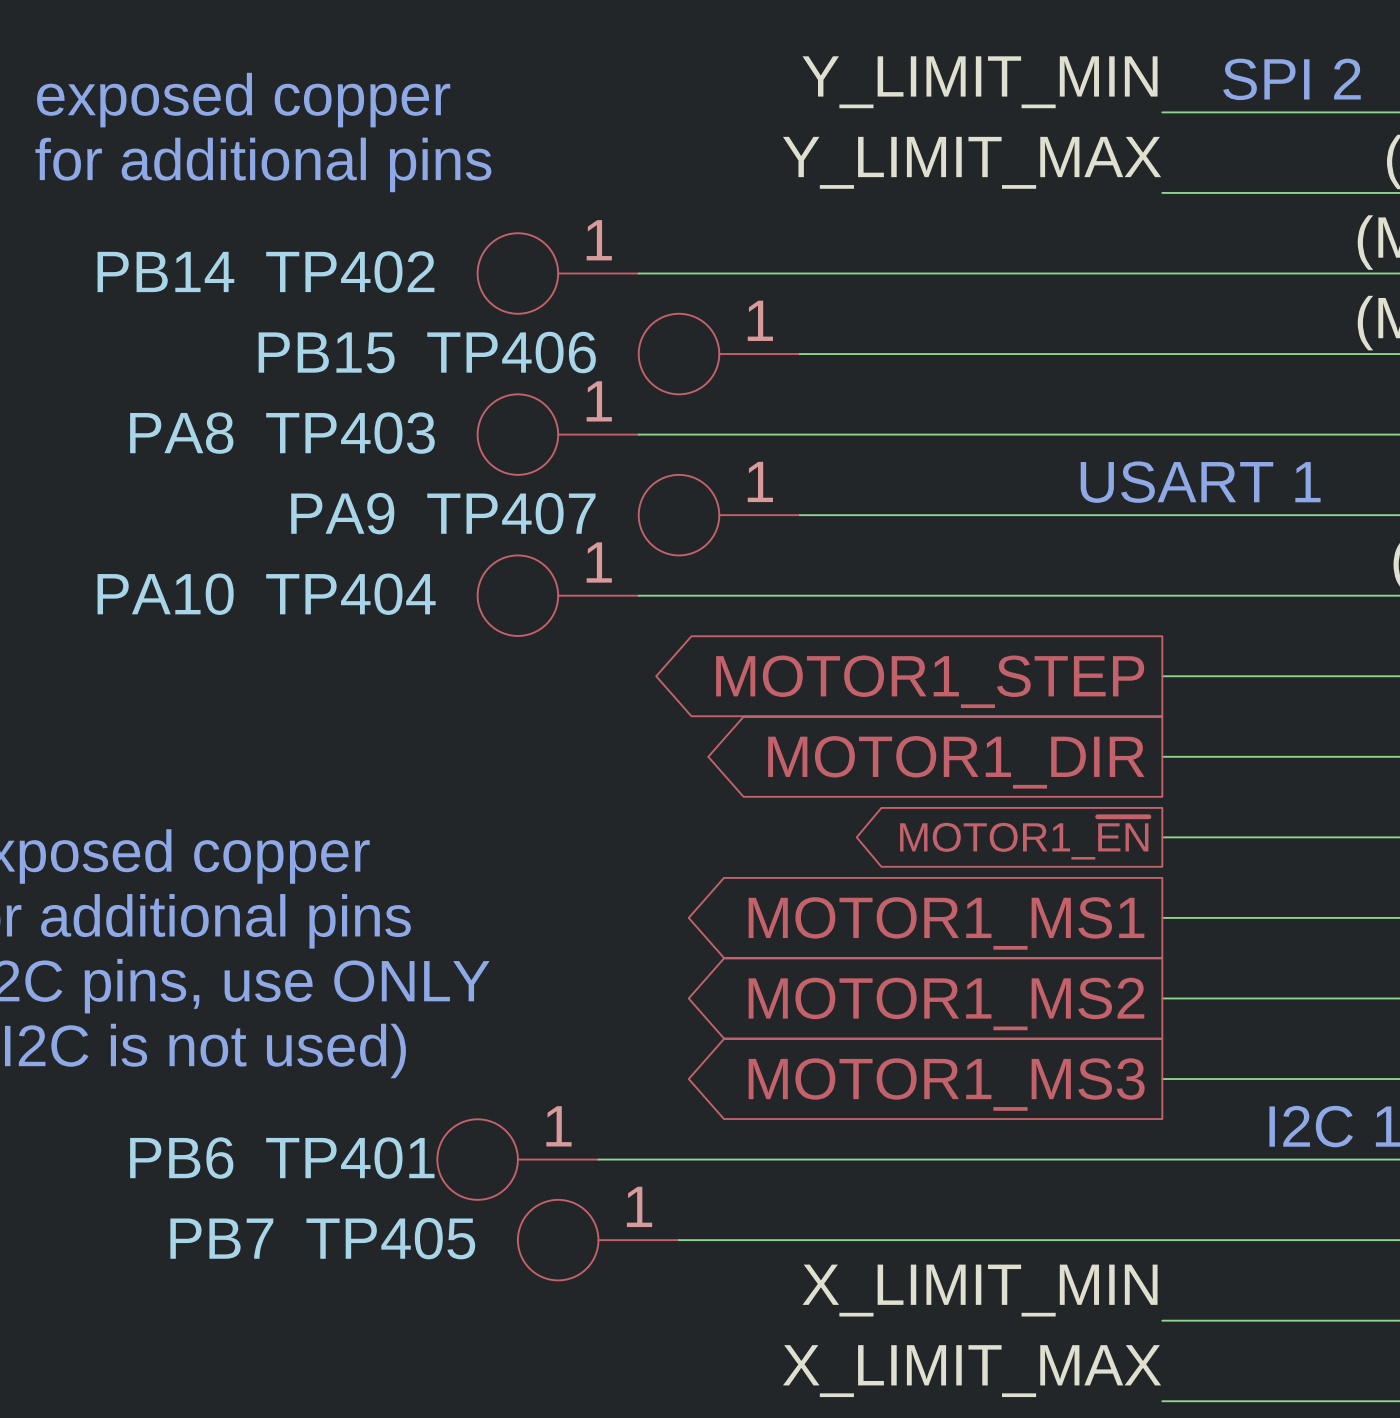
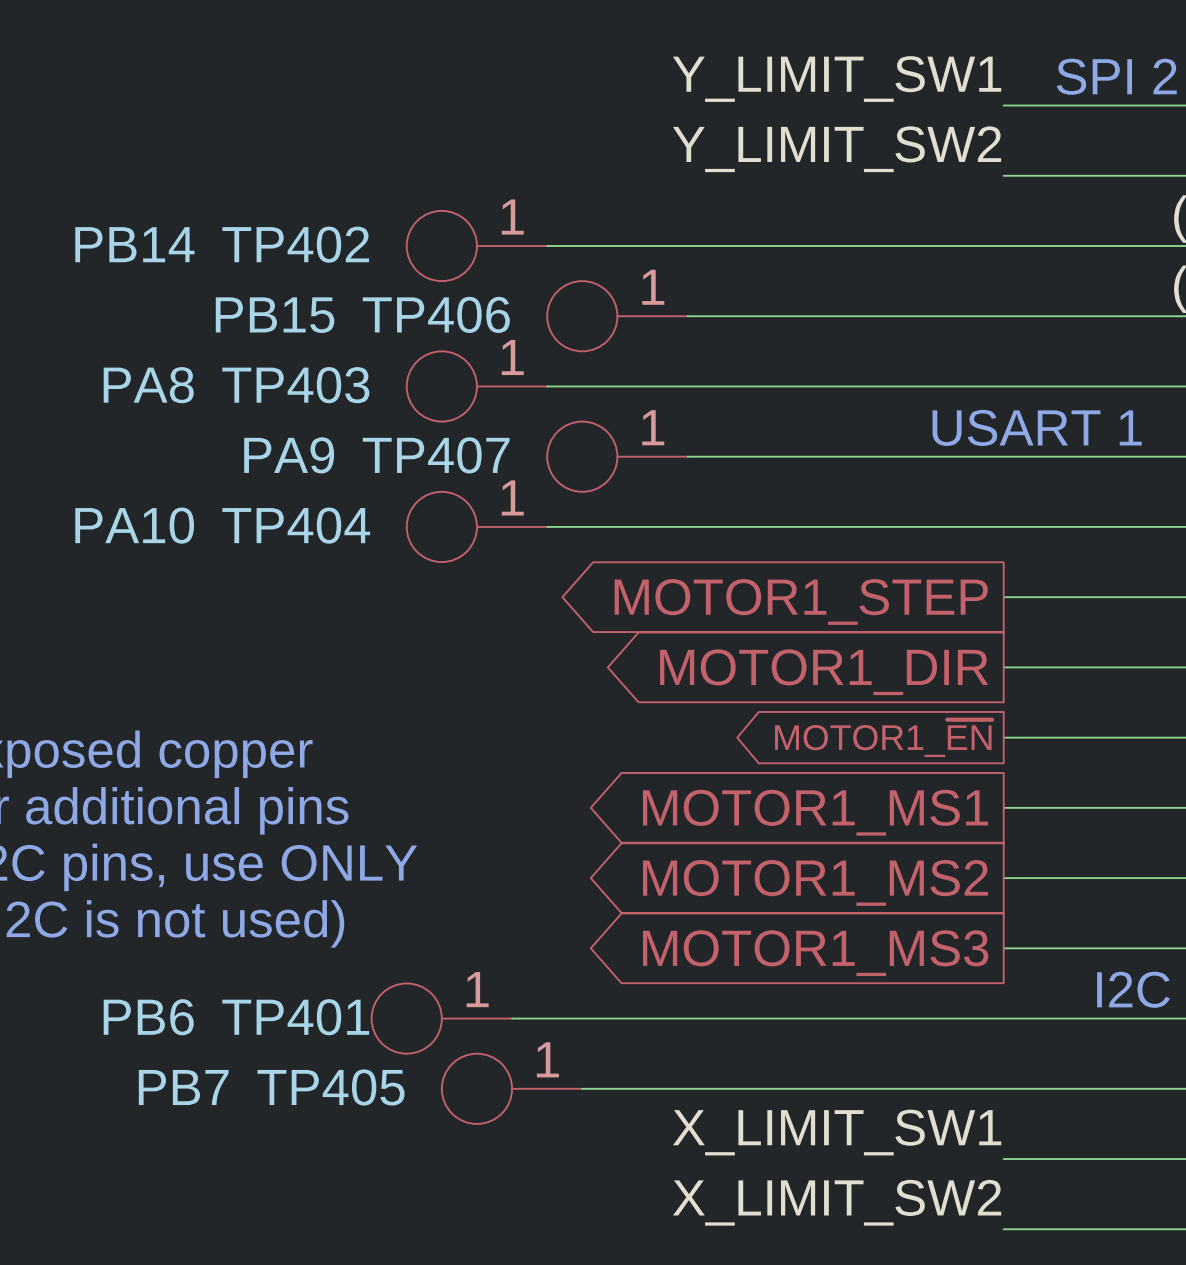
label: Y_LIMIT_MIN (980, 82) -> Y_LIMIT_SW1 (837, 79)
text: exposed copper (243, 100) -> none
label: Y_LIMIT_MAX (972, 162) -> Y_LIMIT_SW2 (837, 149)
text: for additional pins (263, 164) -> none
label: X_LIMIT_MIN (980, 1290) -> X_LIMIT_SW1 (837, 1132)
label: X_LIMIT_MAX (972, 1371) -> X_LIMIT_SW2 (837, 1202)

